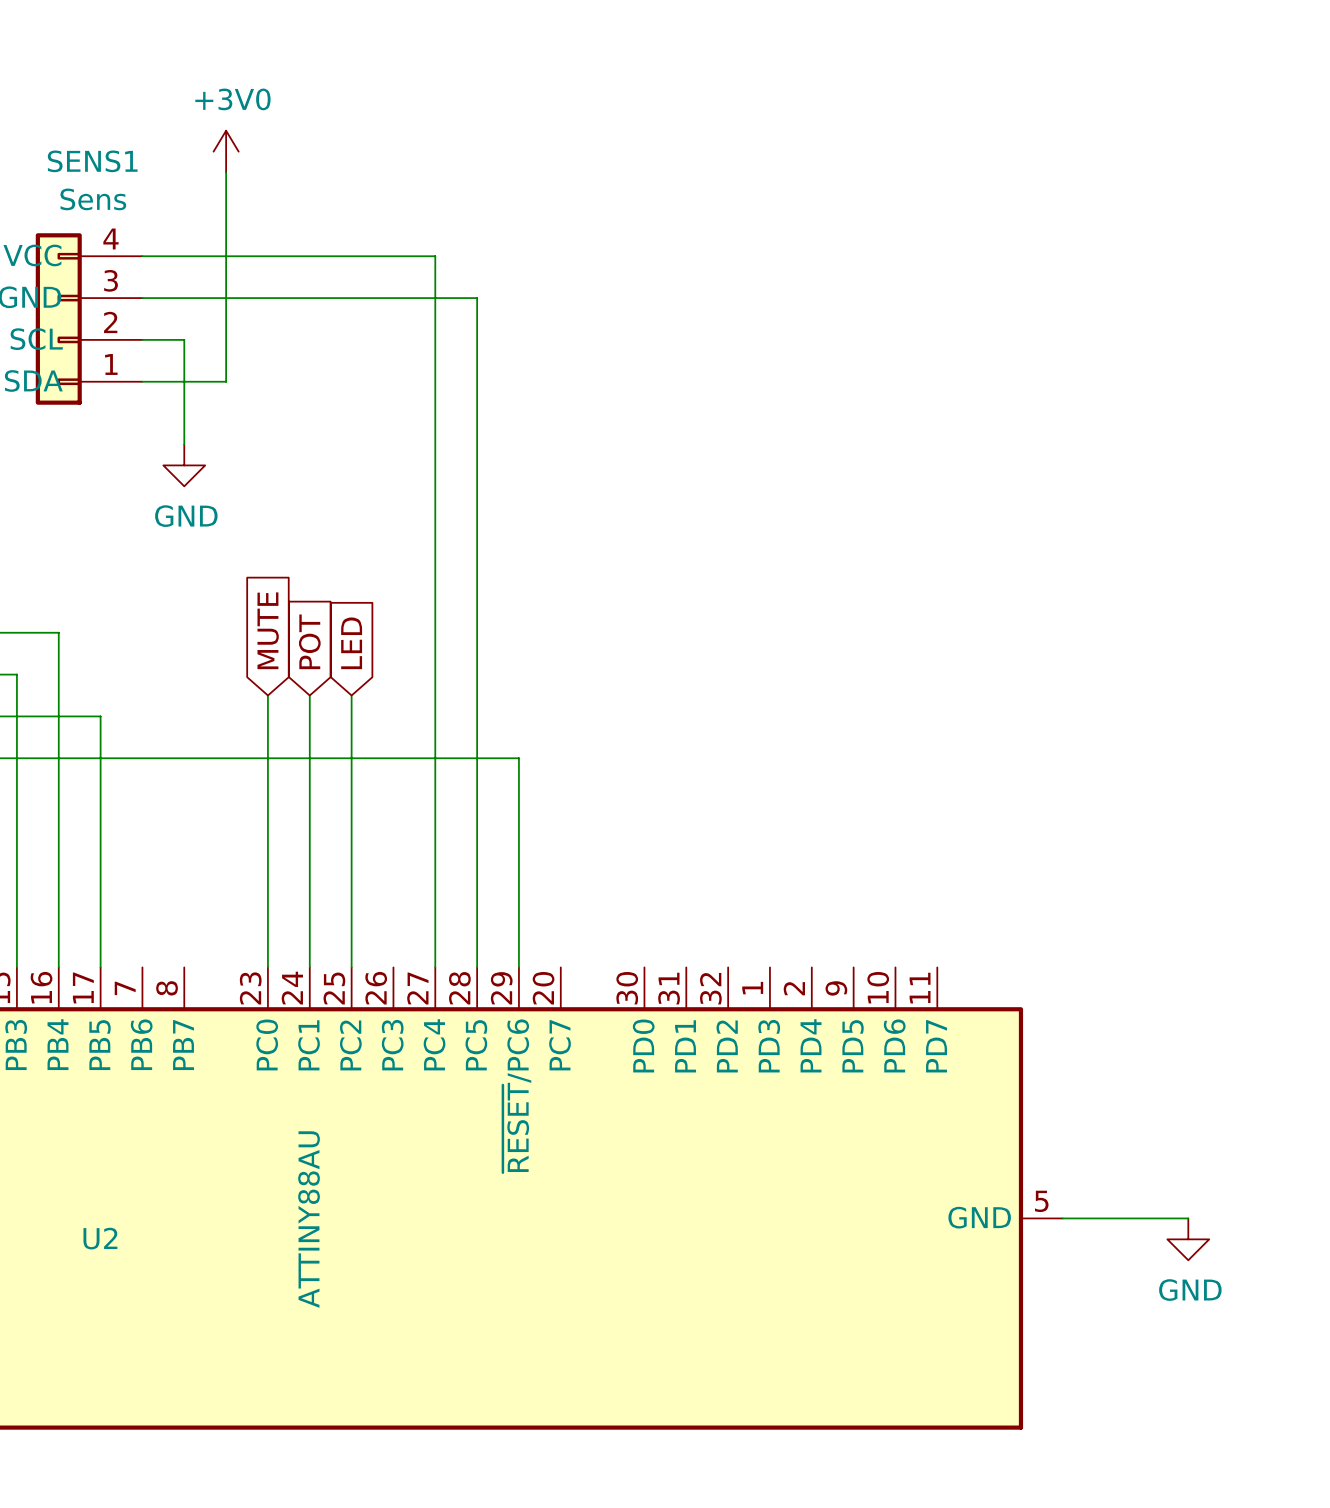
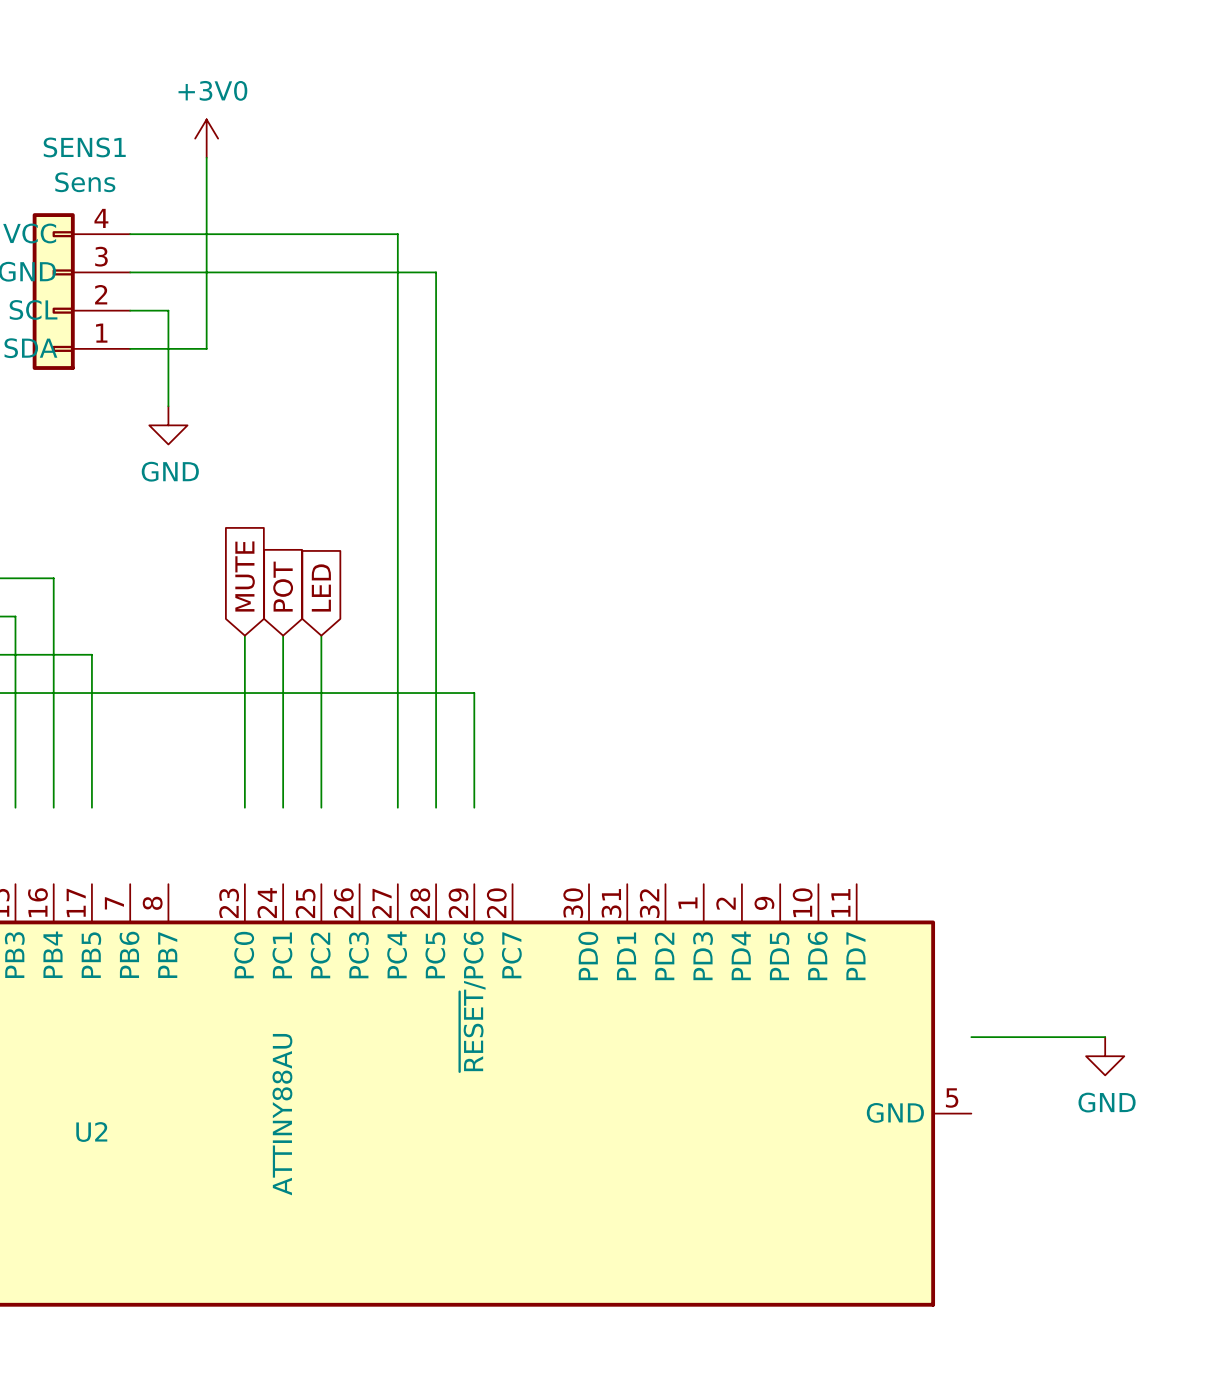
wire: (16, 883) (16, 967) -> none
wire: (58, 883) (58, 967) -> none
wire: (100, 883) (100, 967) -> none
wire: (267, 883) (267, 967) -> none
wire: (309, 883) (309, 967) -> none
wire: (351, 883) (351, 967) -> none
wire: (435, 883) (435, 967) -> none
wire: (477, 883) (477, 967) -> none
wire: (518, 883) (518, 967) -> none
wire: none -> (971, 1037) (1105, 1037)
wire: (1062, 1218) (1188, 1218) -> none
power symbol position: GND (1188, 1239) -> GND (1105, 1056)

